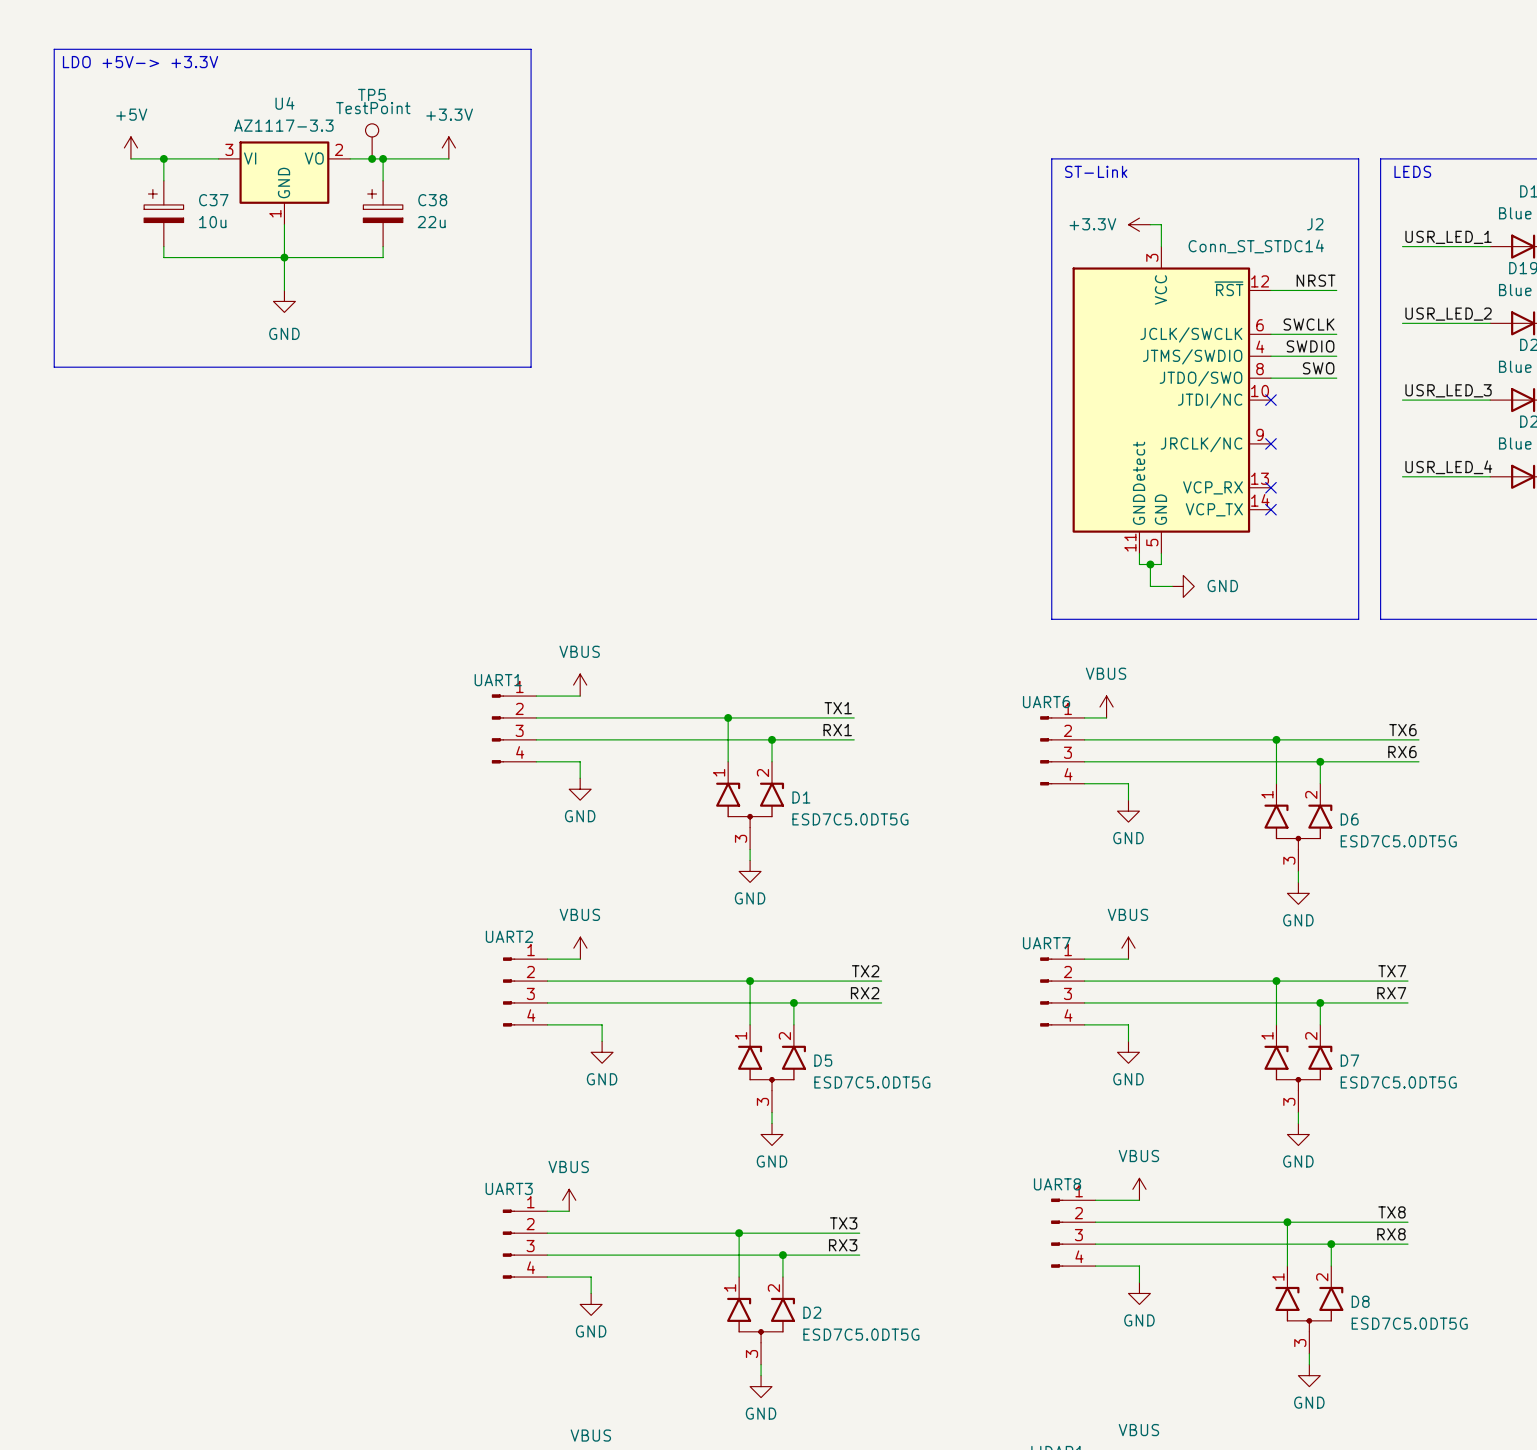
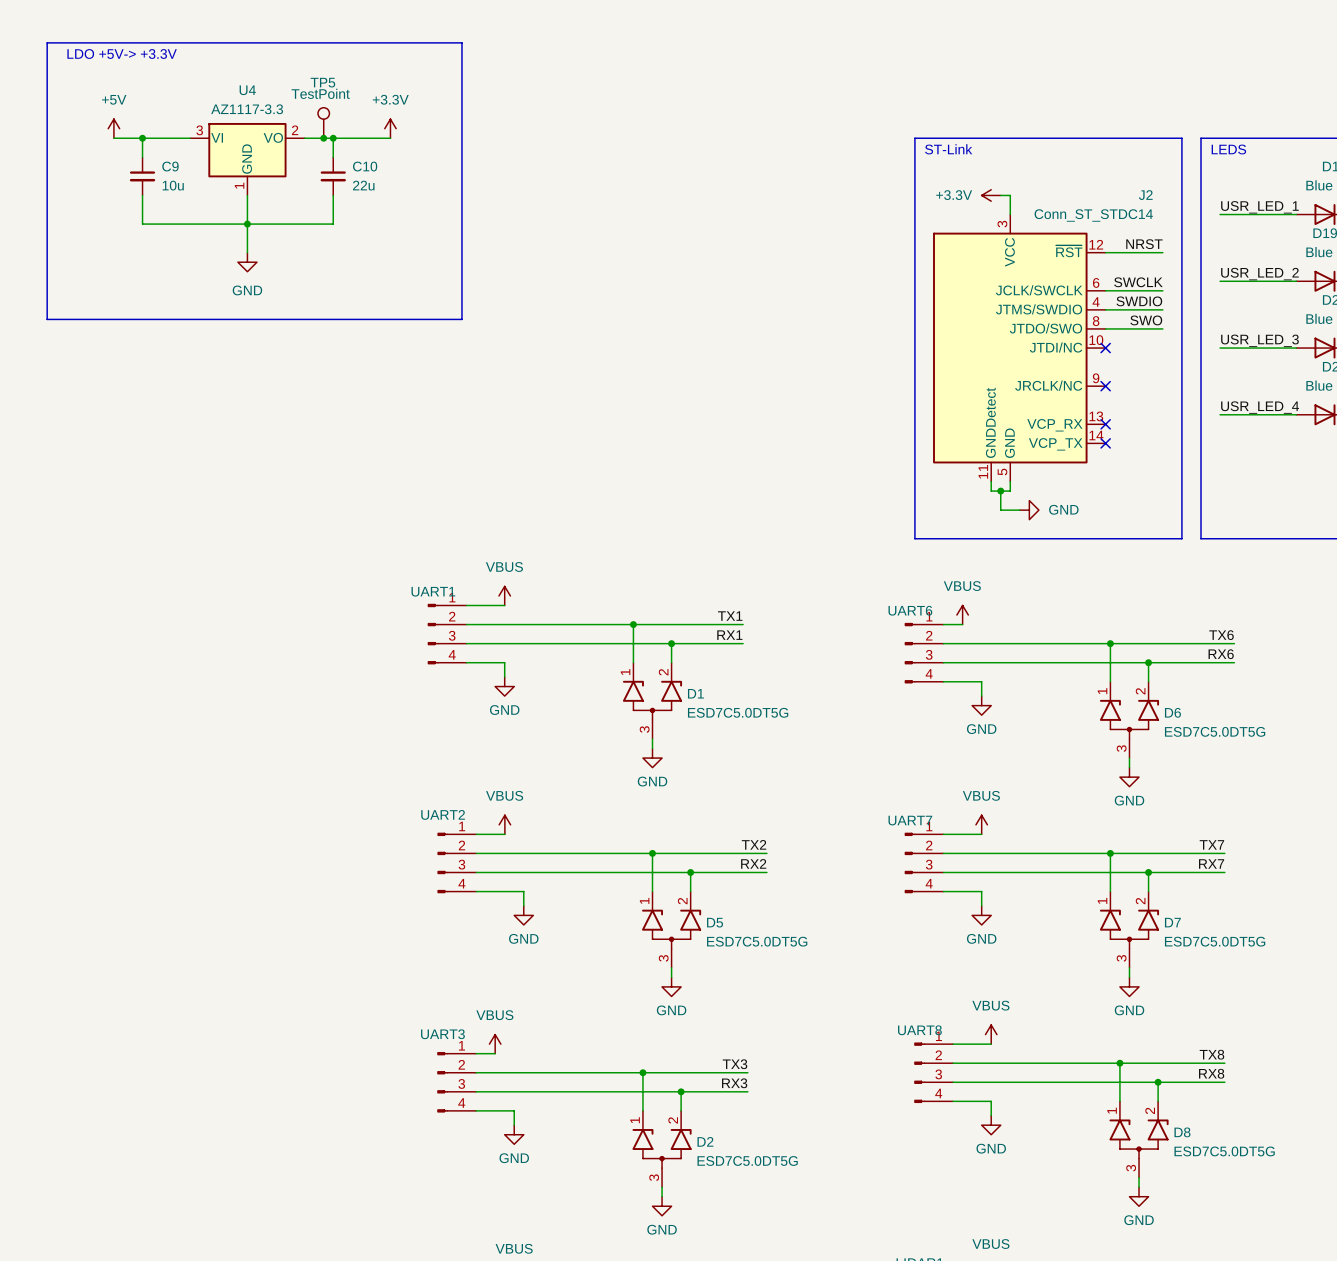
C9: none -> 10u (142, 176)
C10: none -> 22u (333, 176)
C37: 10u (163, 213) -> none
C38: 22u (383, 213) -> none

